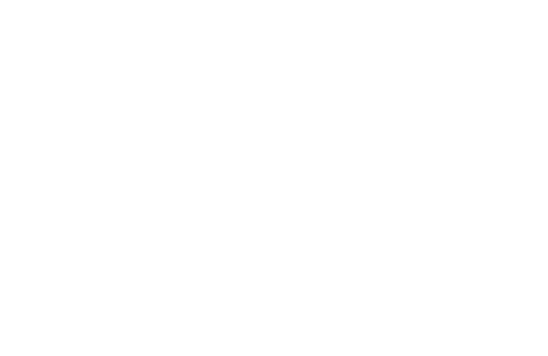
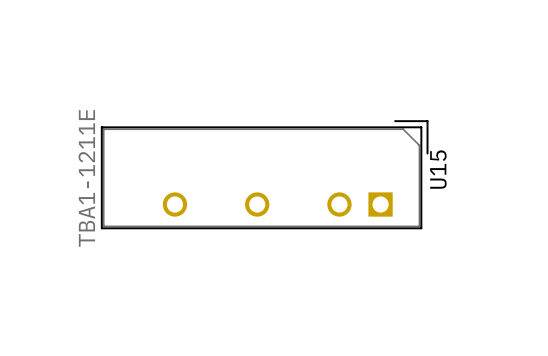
U15: none -> TBA1-1211E (264, 174)

